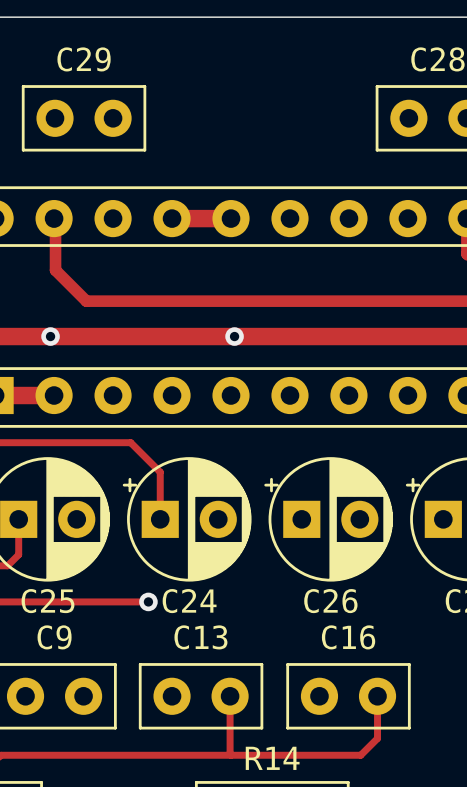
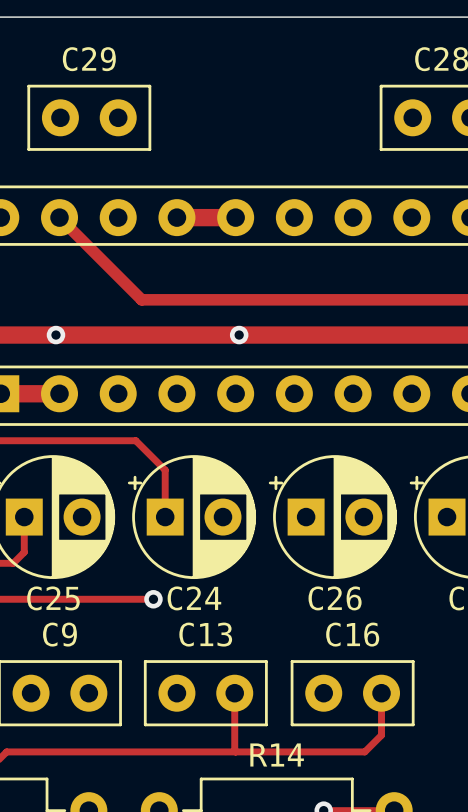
track: (55, 220) (55, 270) (86, 301) (136, 301) -> (60, 219) (141, 299)

